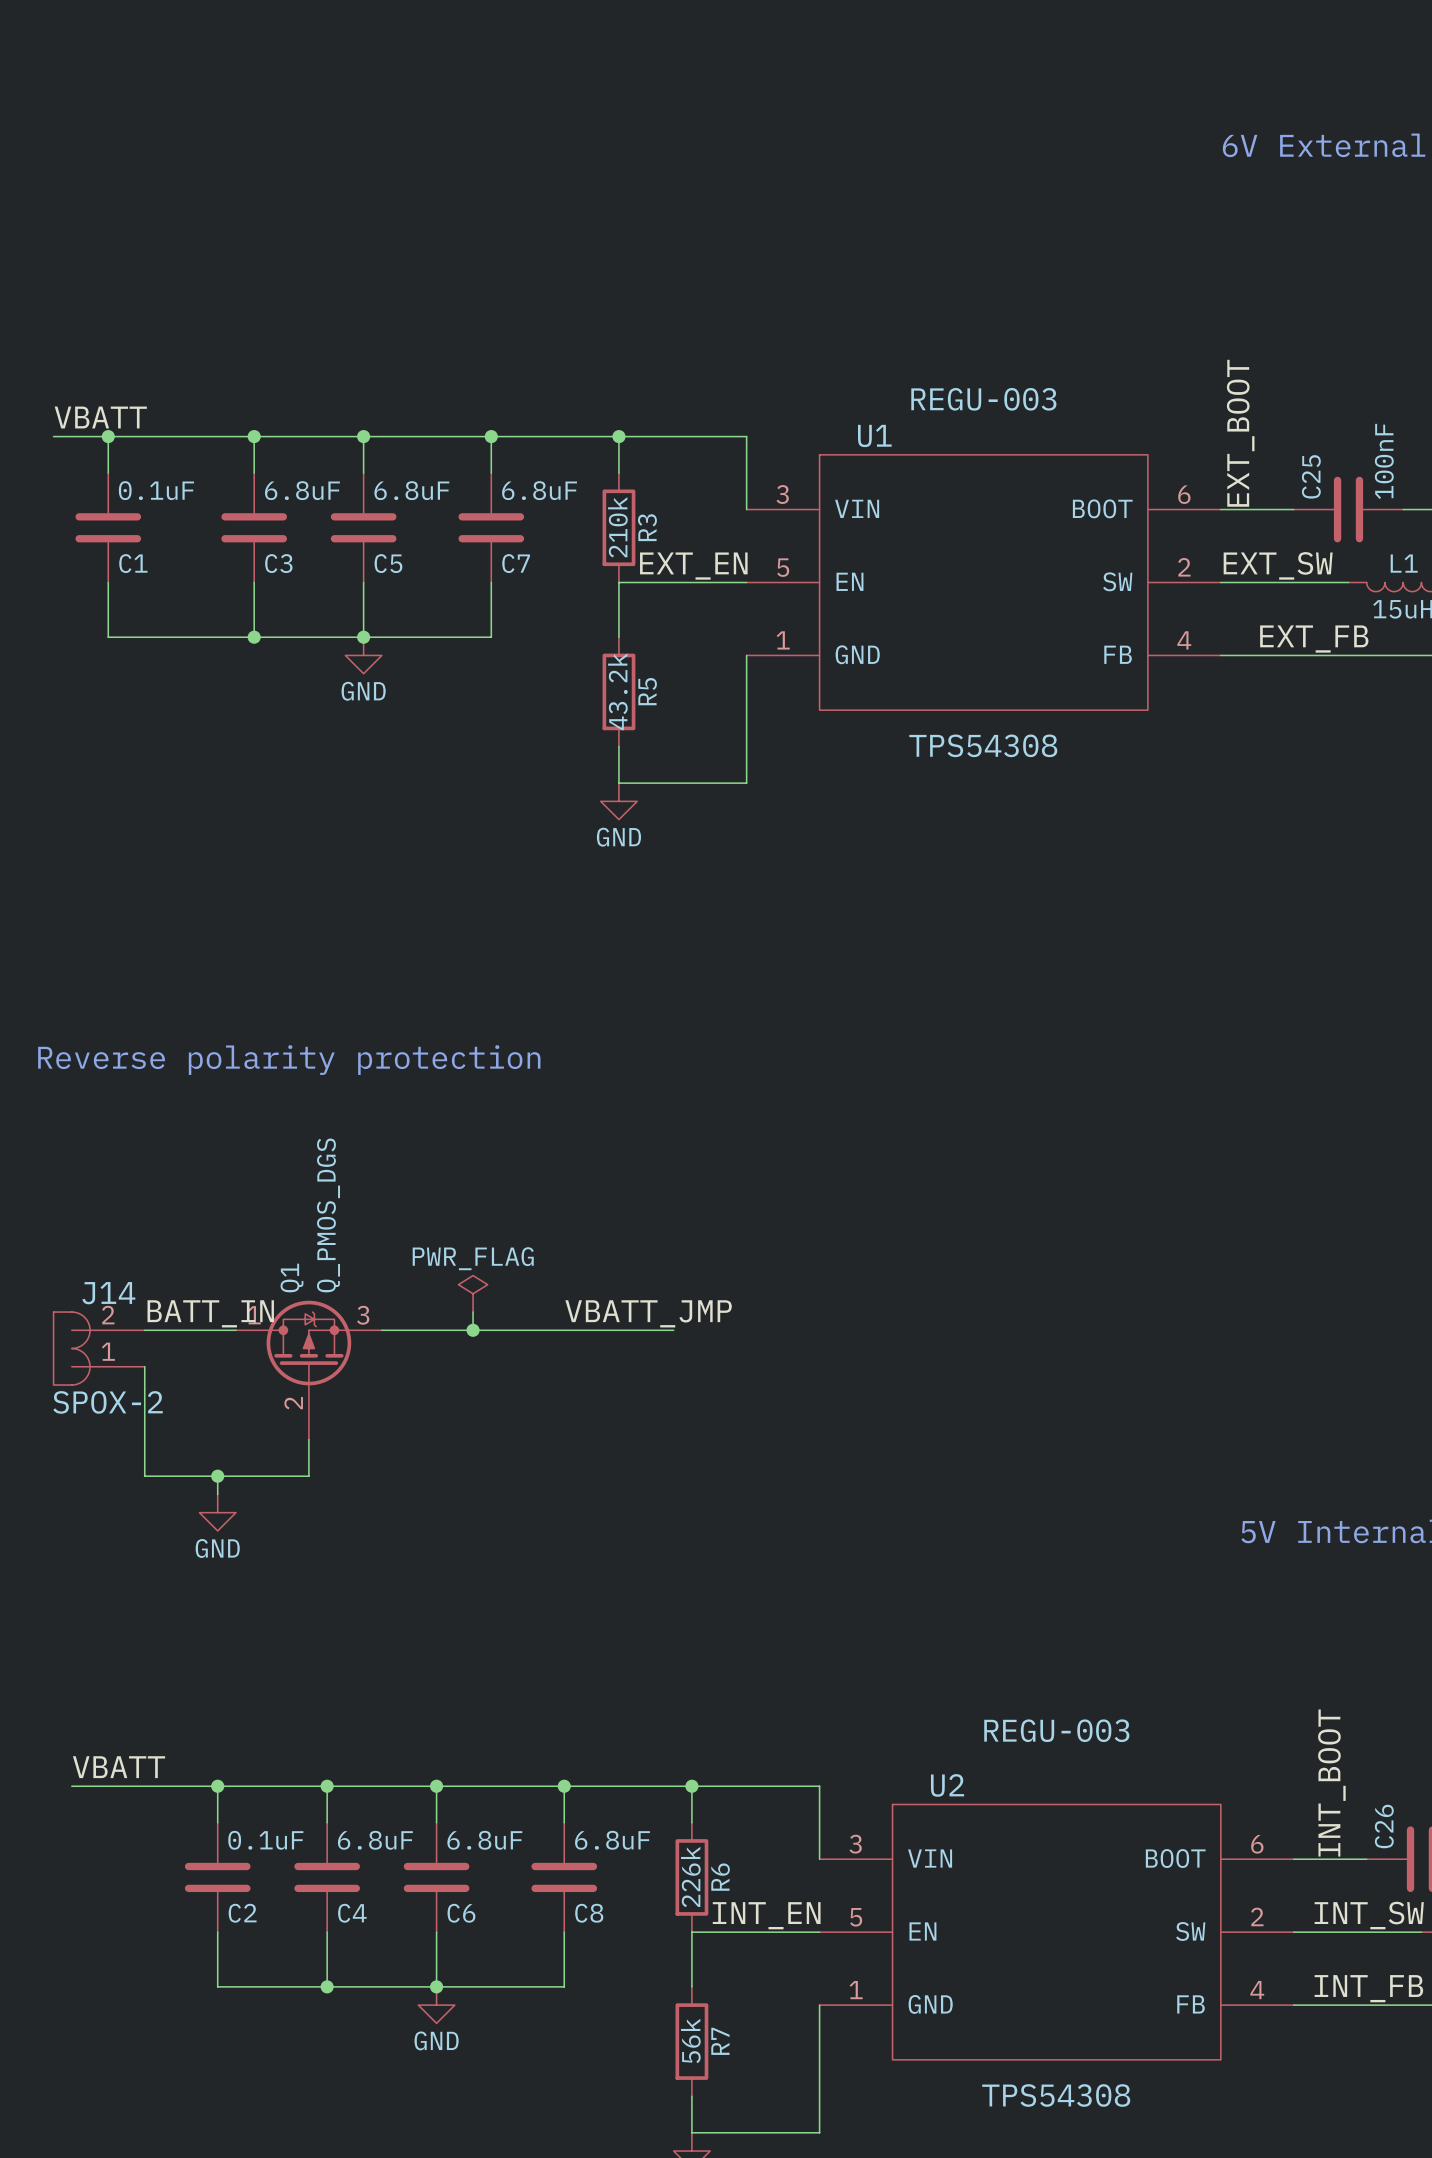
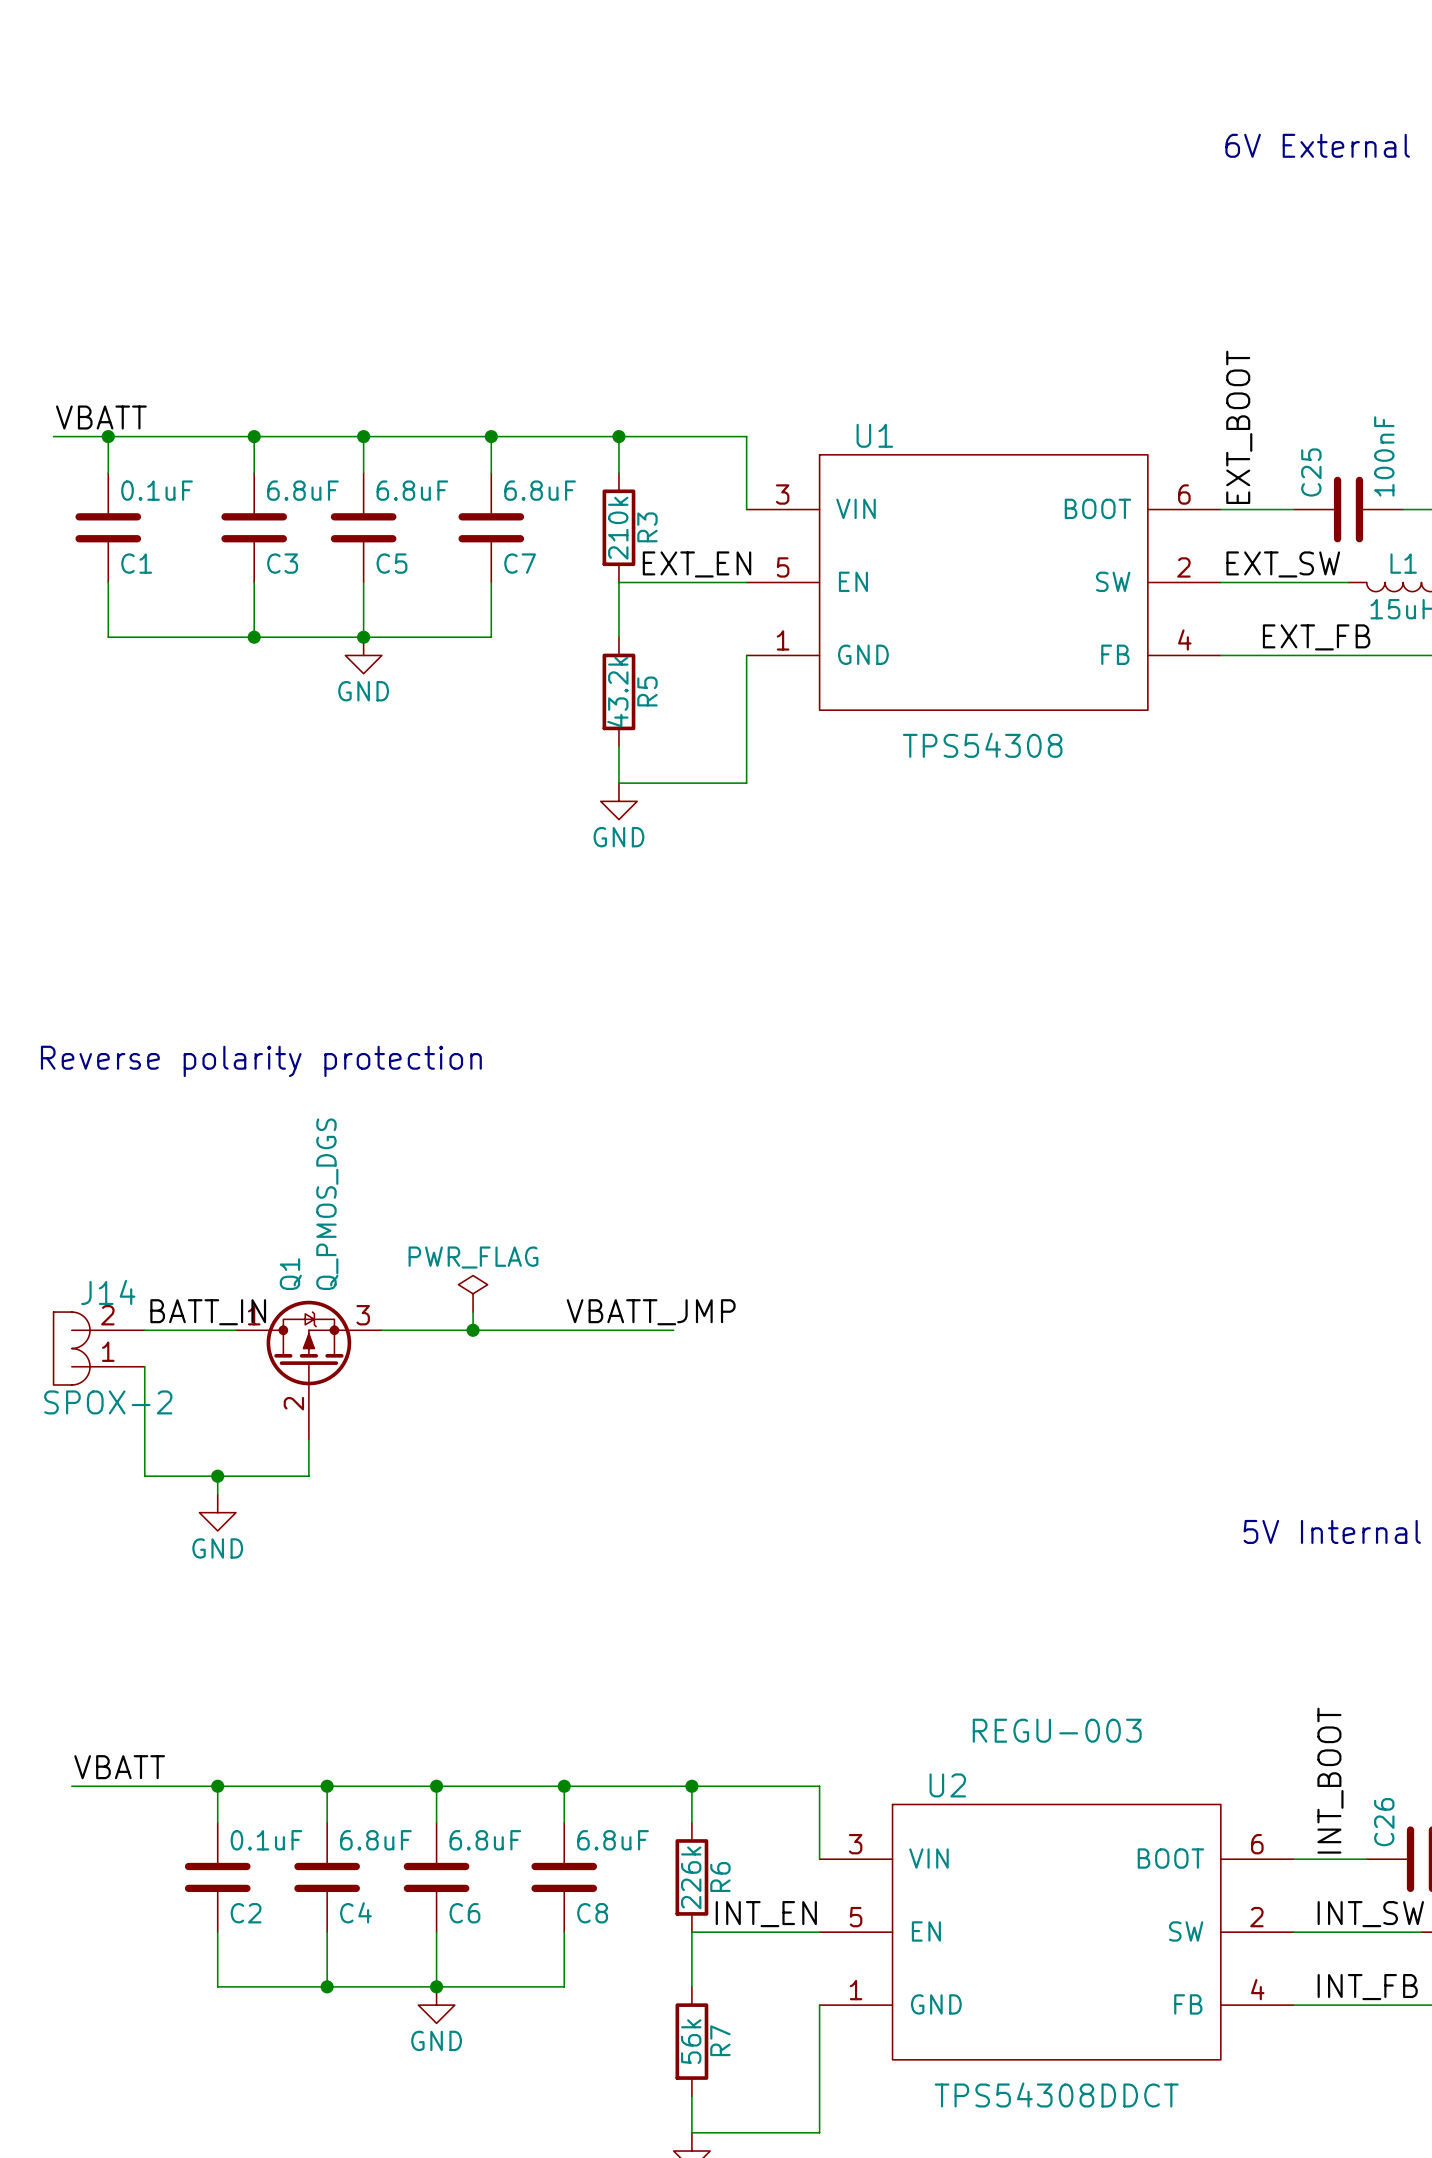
U1 text: REGU-003 (983, 399) -> none
U2 value: TPS54308 (1056, 2095) -> TPS54308DDCT (1056, 2094)

